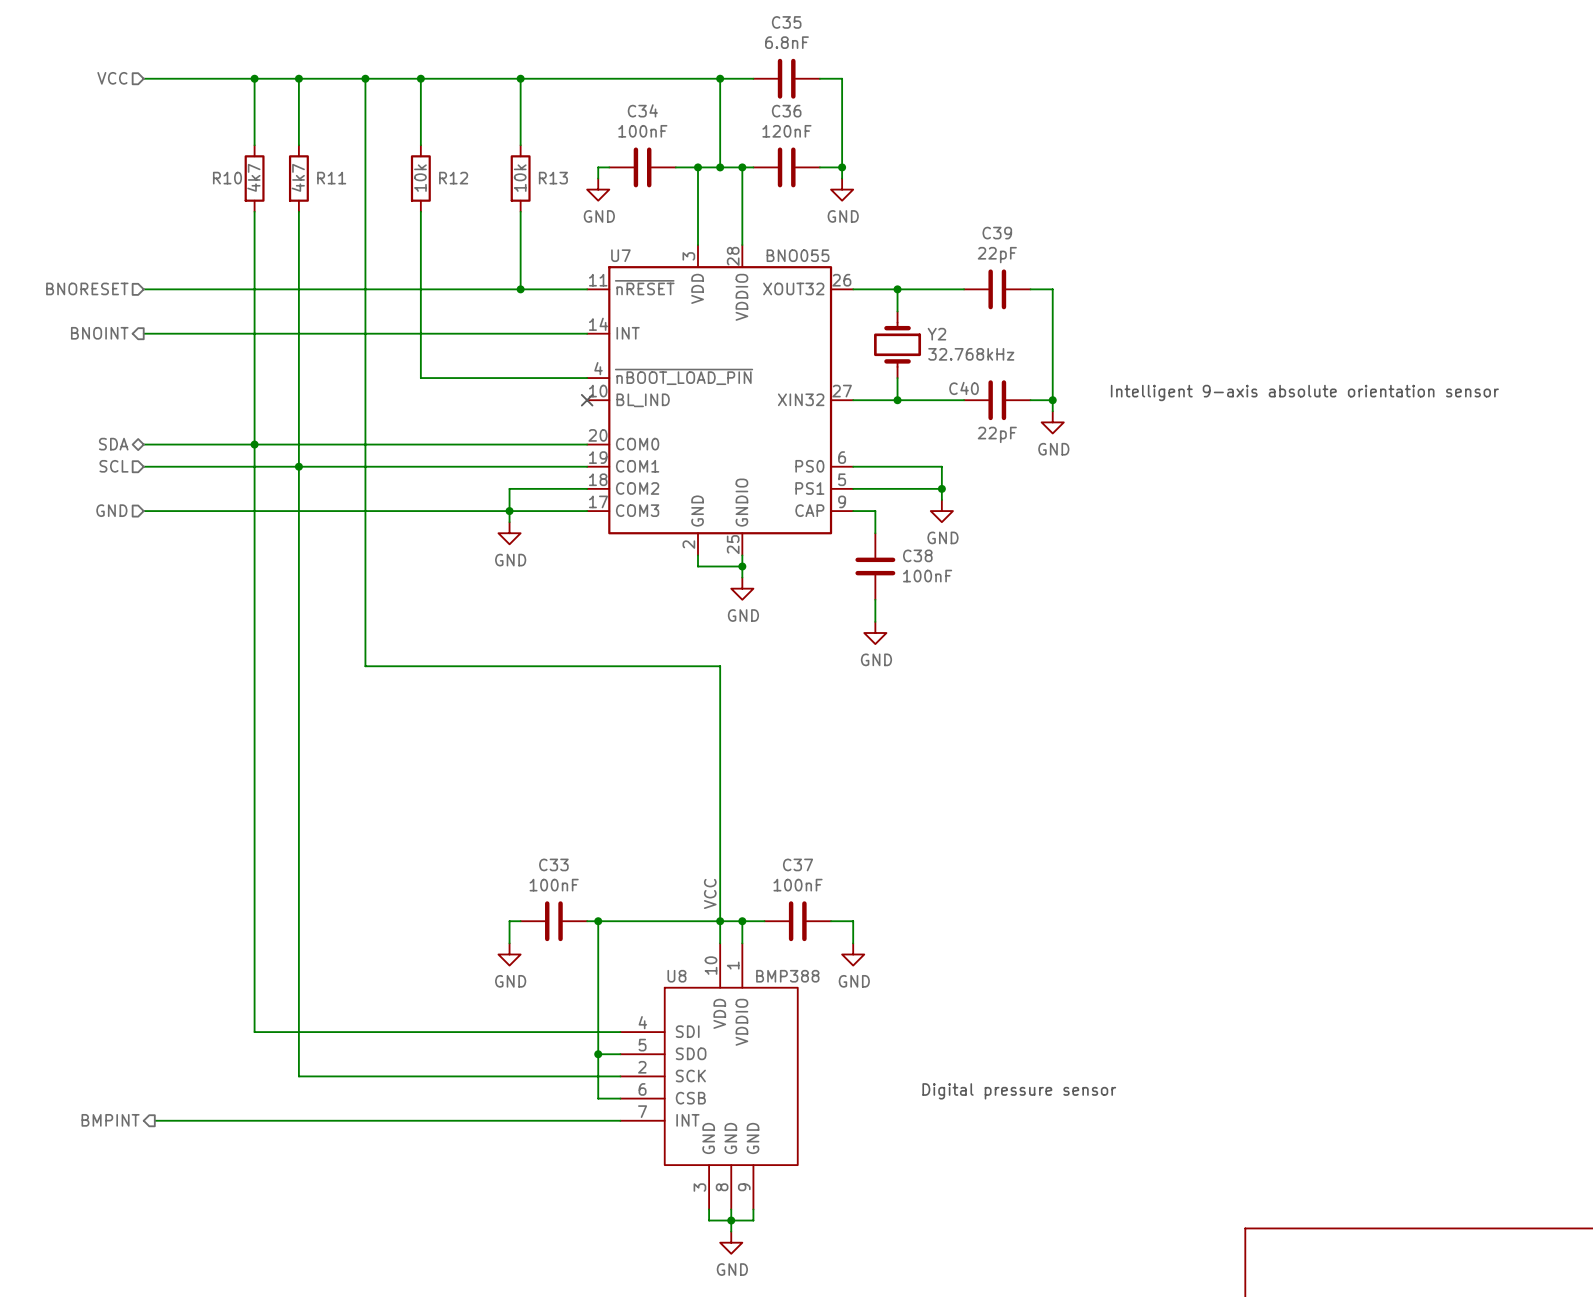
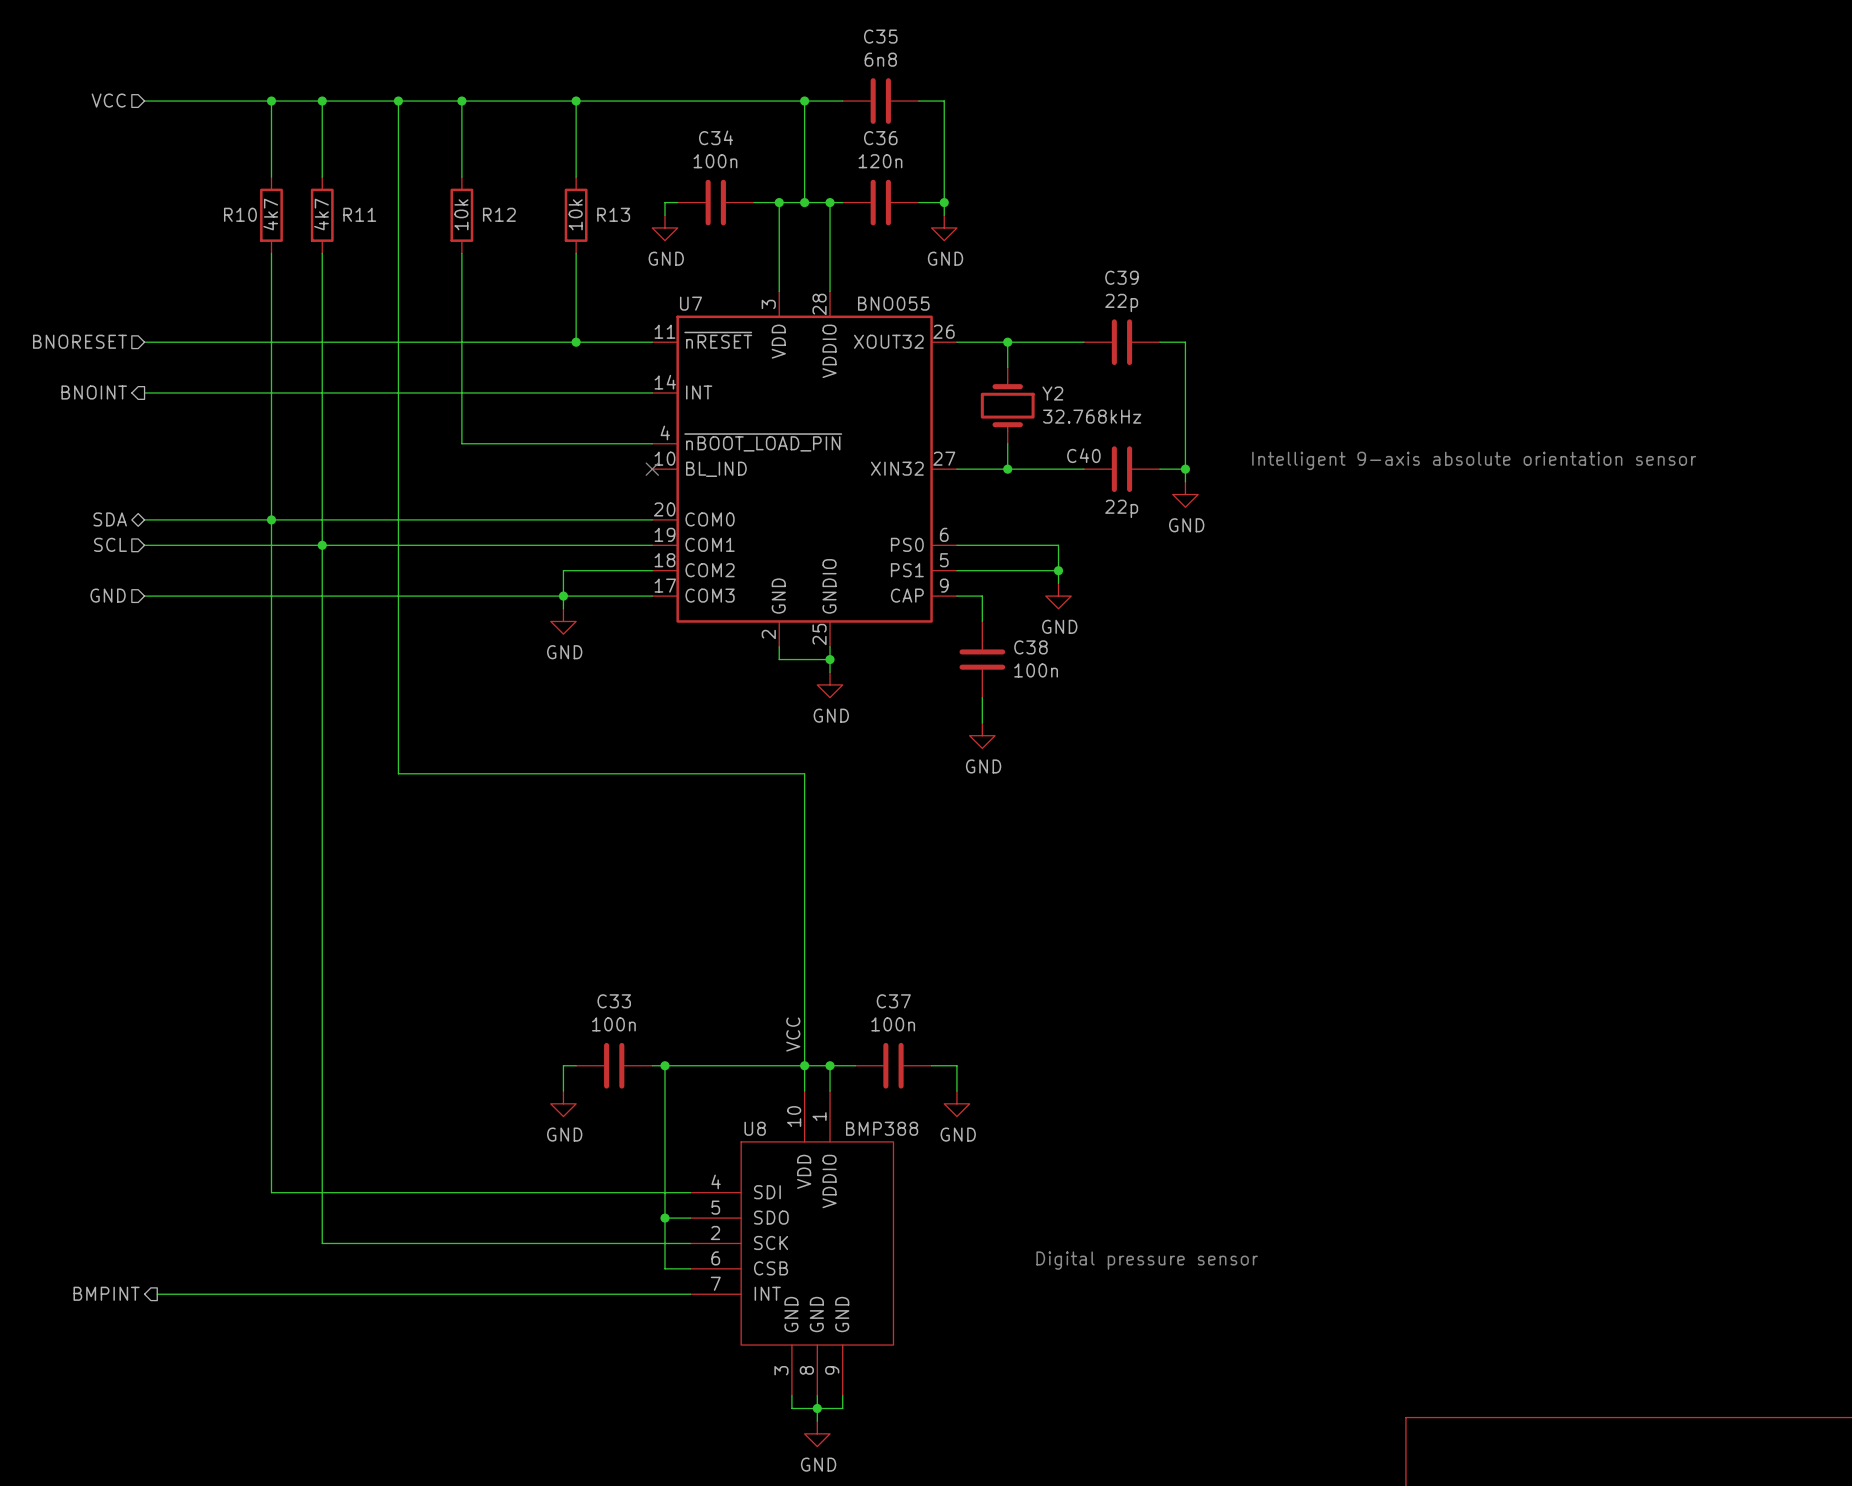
C35 value: 6.8nF (786, 42) -> 6n8 (880, 59)
C34 value: 100nF (642, 131) -> 100n (715, 161)
C36 value: 120nF (786, 131) -> 120n (880, 161)
C39 value: 22pF (997, 255) -> 22p (1121, 302)
C40 value: 22pF (997, 434) -> 22p (1121, 508)
C38 value: 100nF (927, 576) -> 100n (1036, 670)
C33 value: 100nF (554, 885) -> 100n (613, 1024)
C37 value: 100nF (798, 885) -> 100n (893, 1024)

